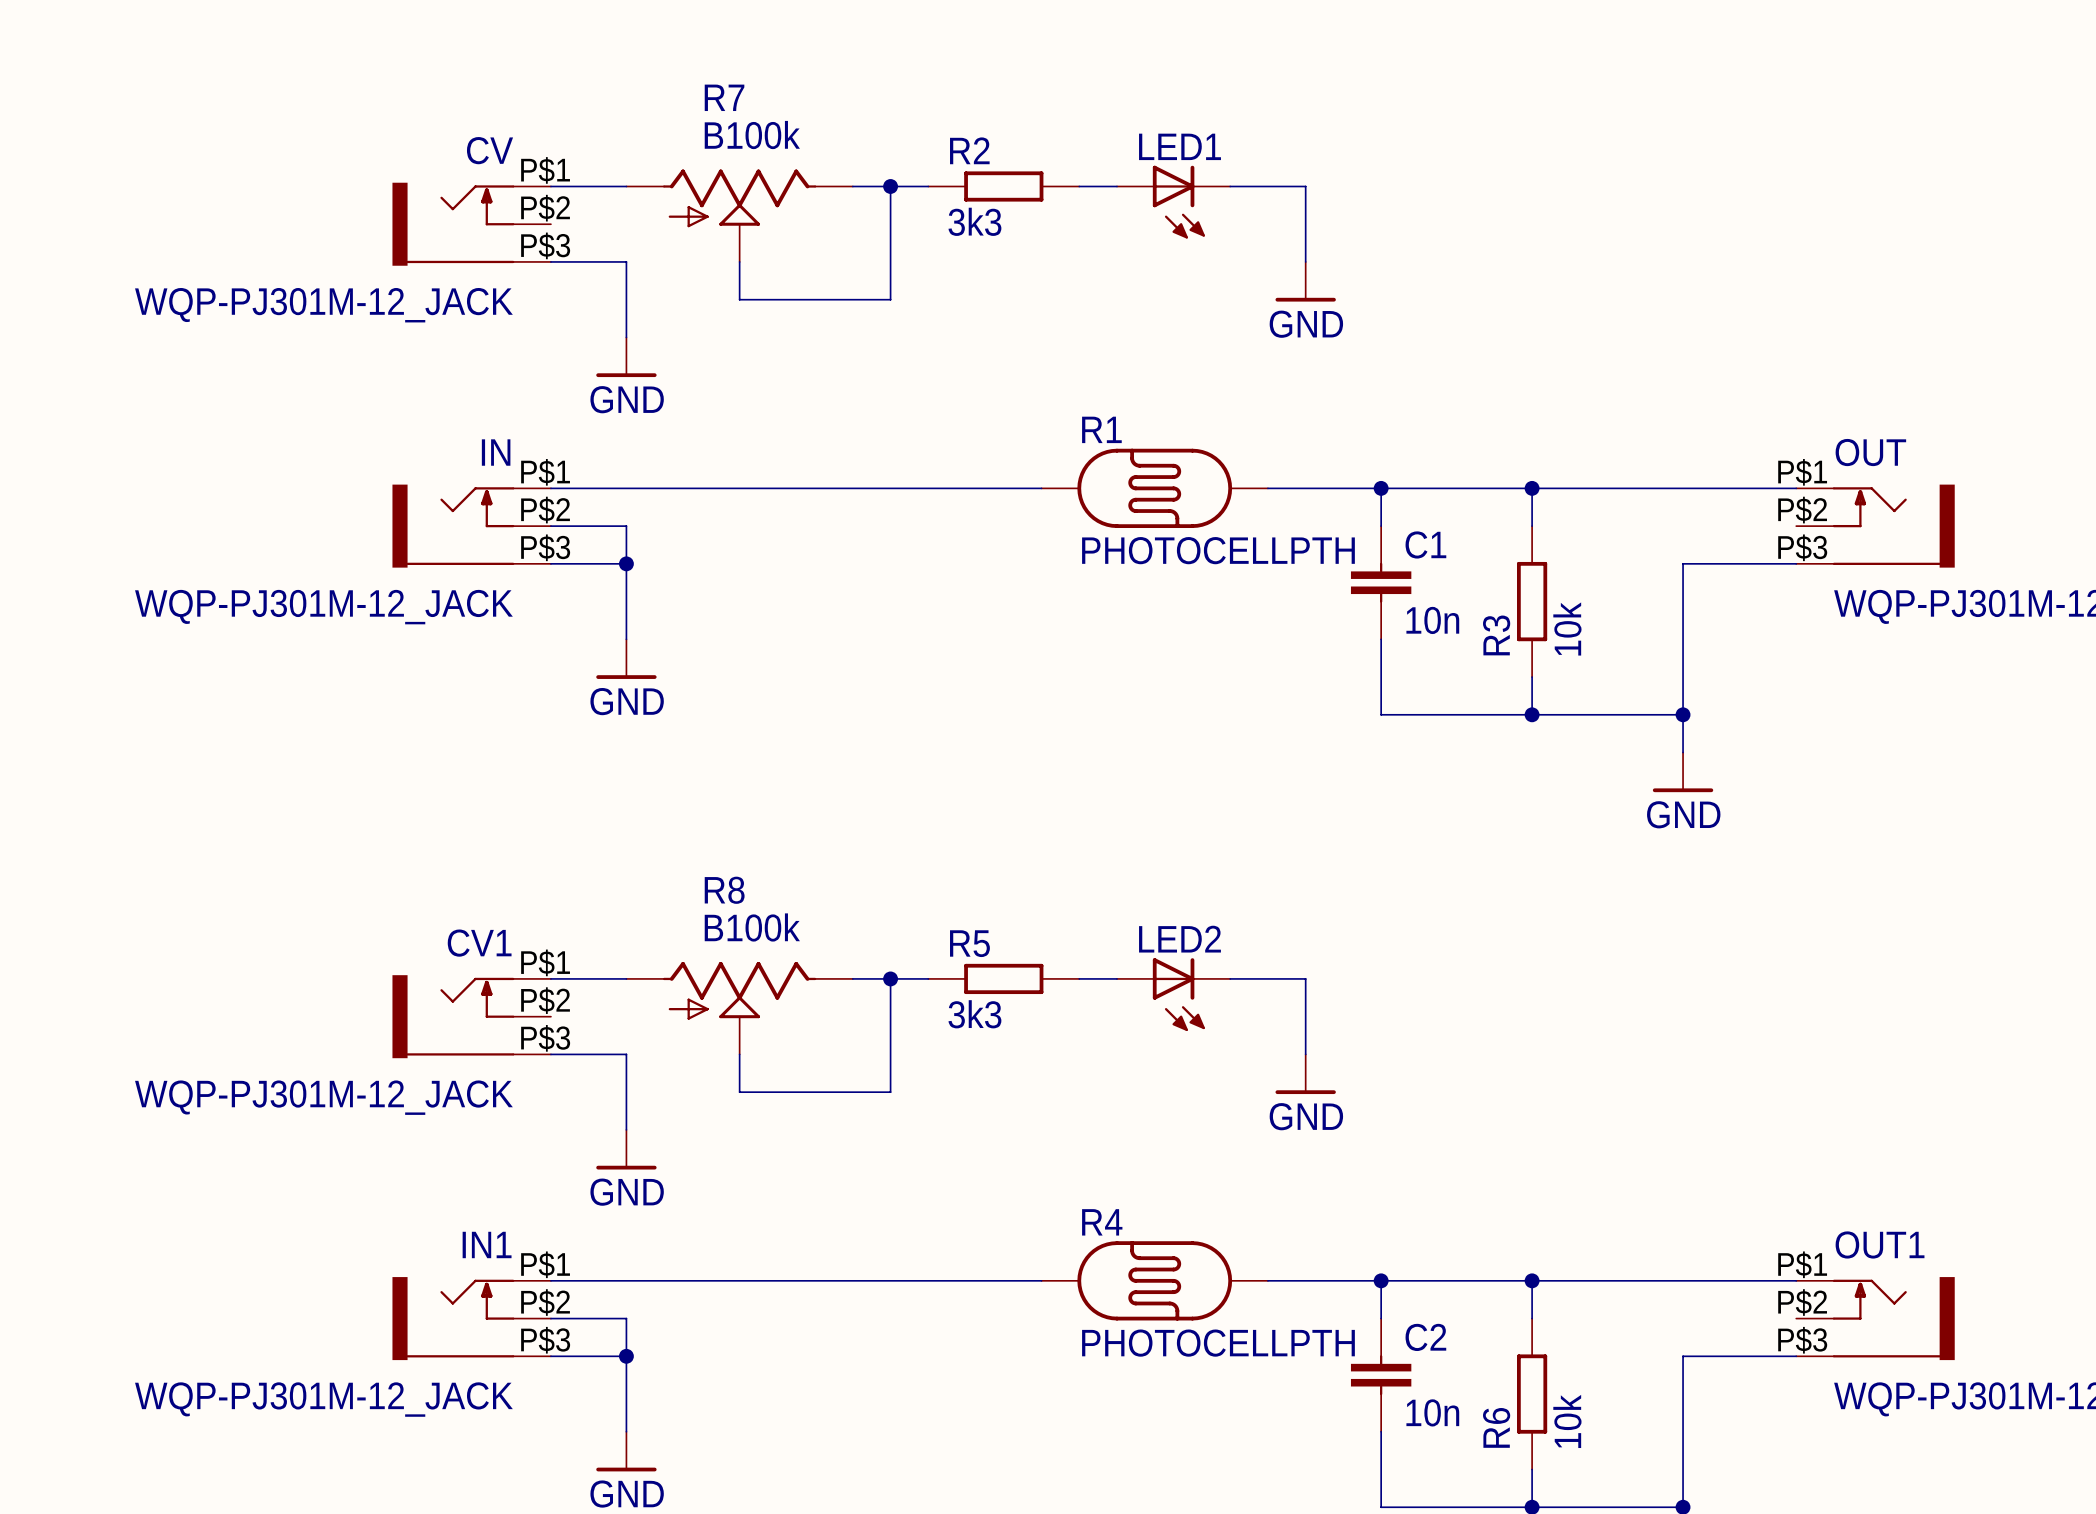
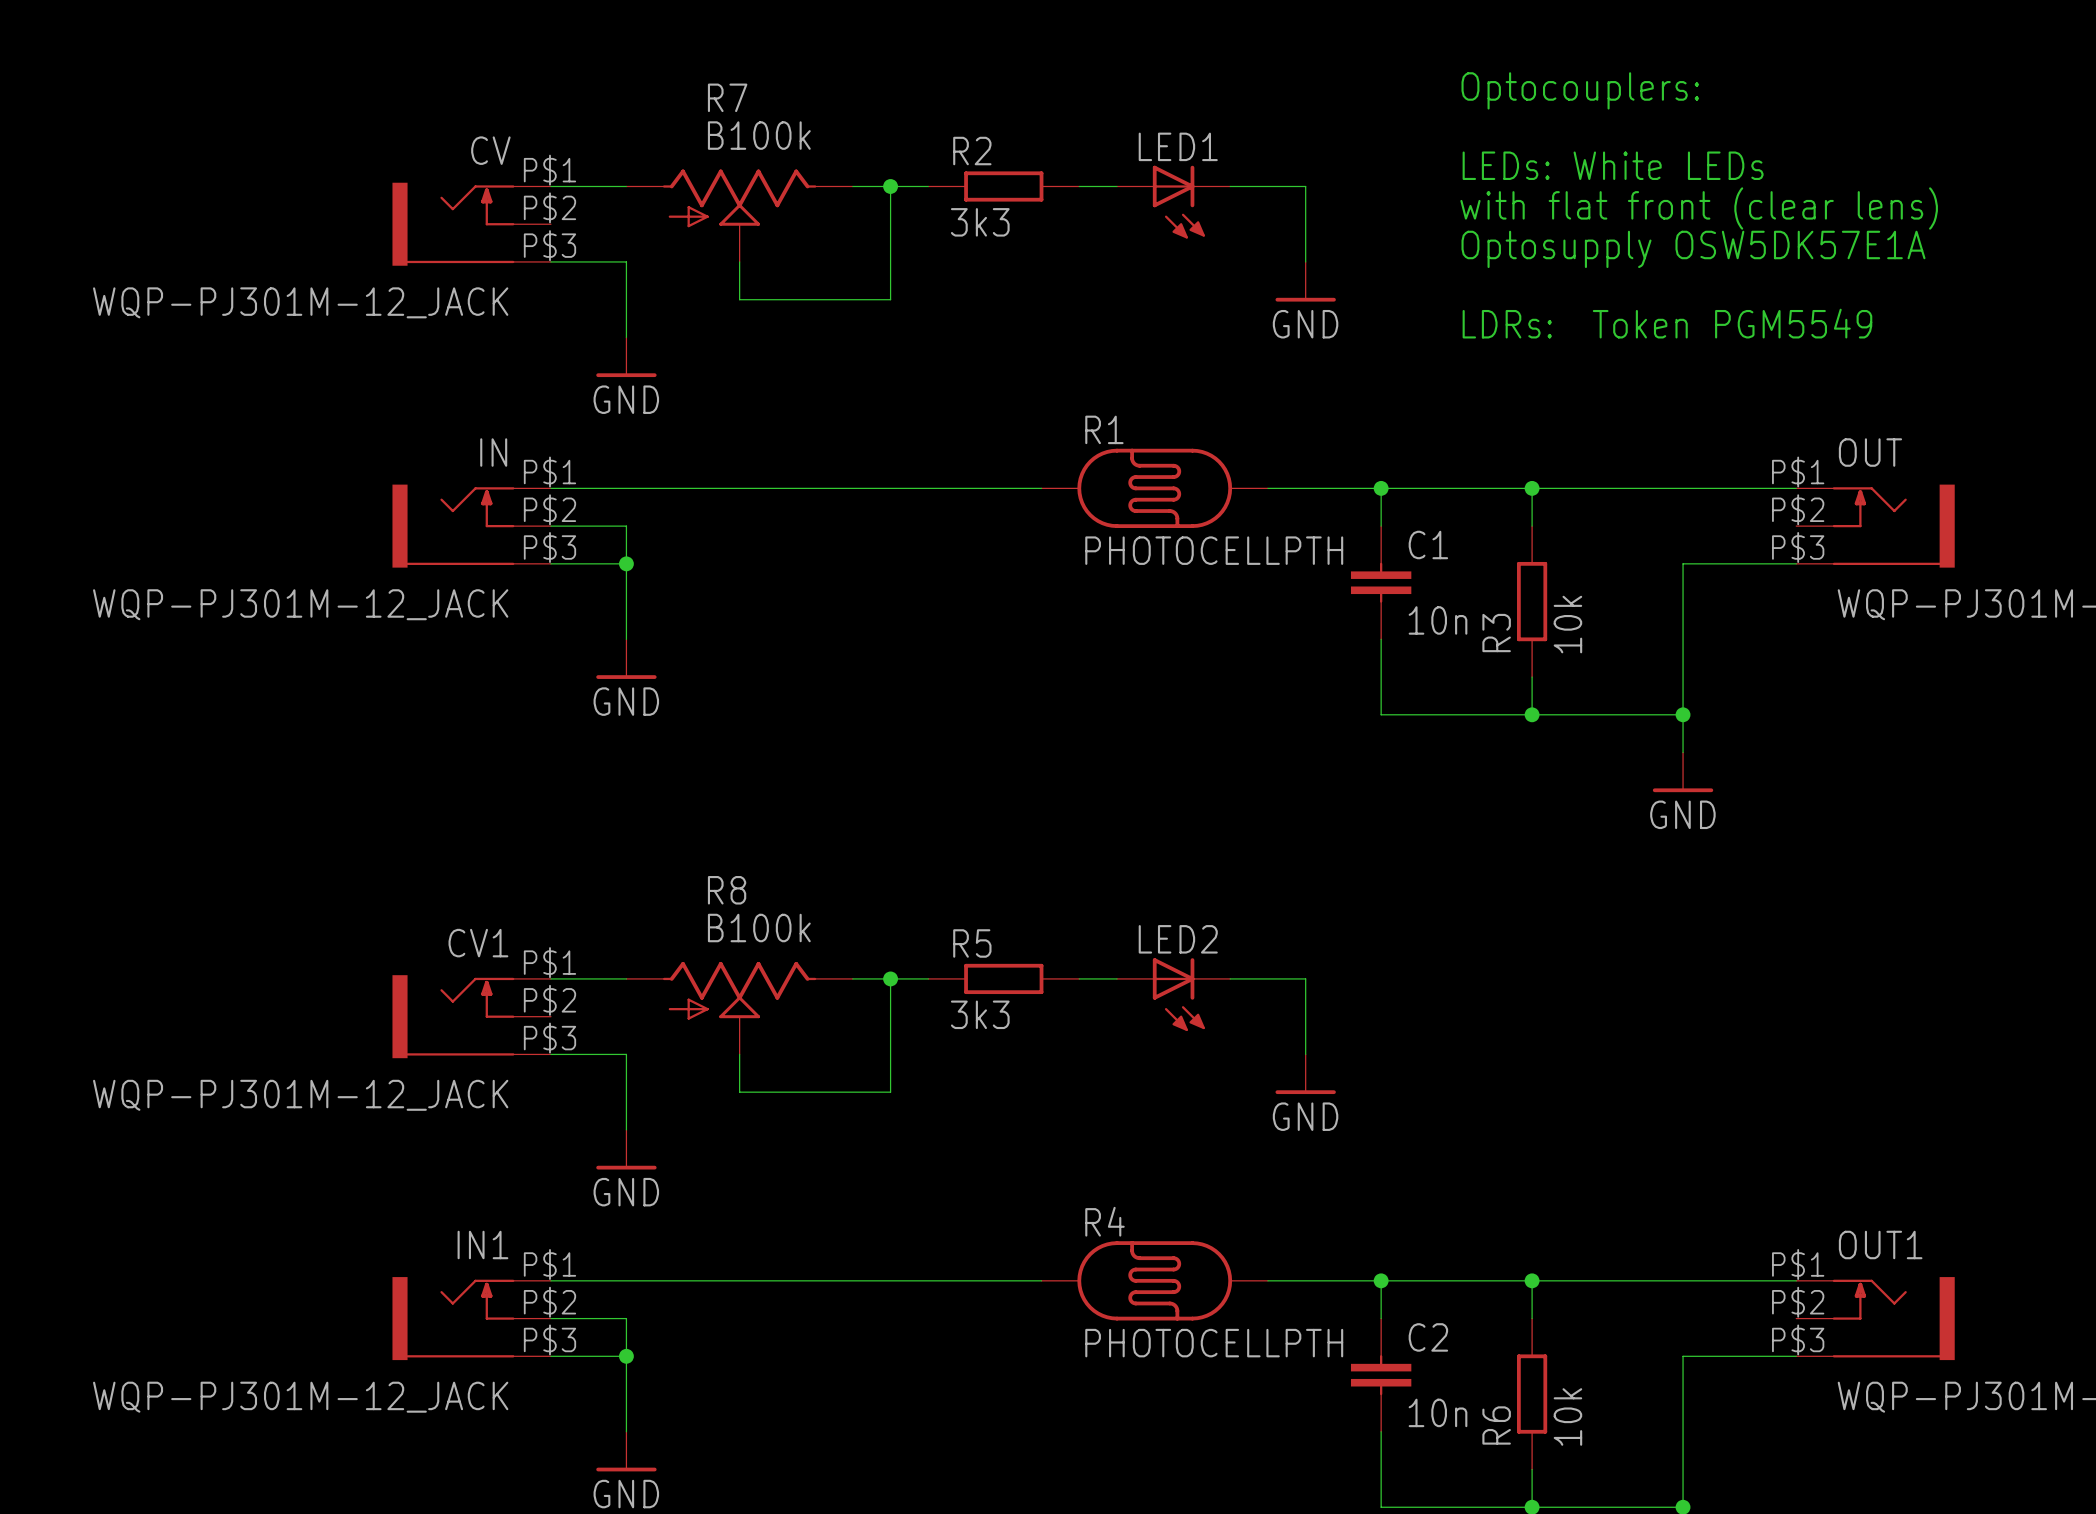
text: none -> Optocouplers: (1580, 90)
text: none -> LEDs: White LEDs (1613, 165)
text: none -> with flat front (clear lens) (1699, 208)
text: none -> Optosupply OSW5DK57E1A (1693, 249)
text: none -> LDRs: Token PGM5549 (1667, 323)

